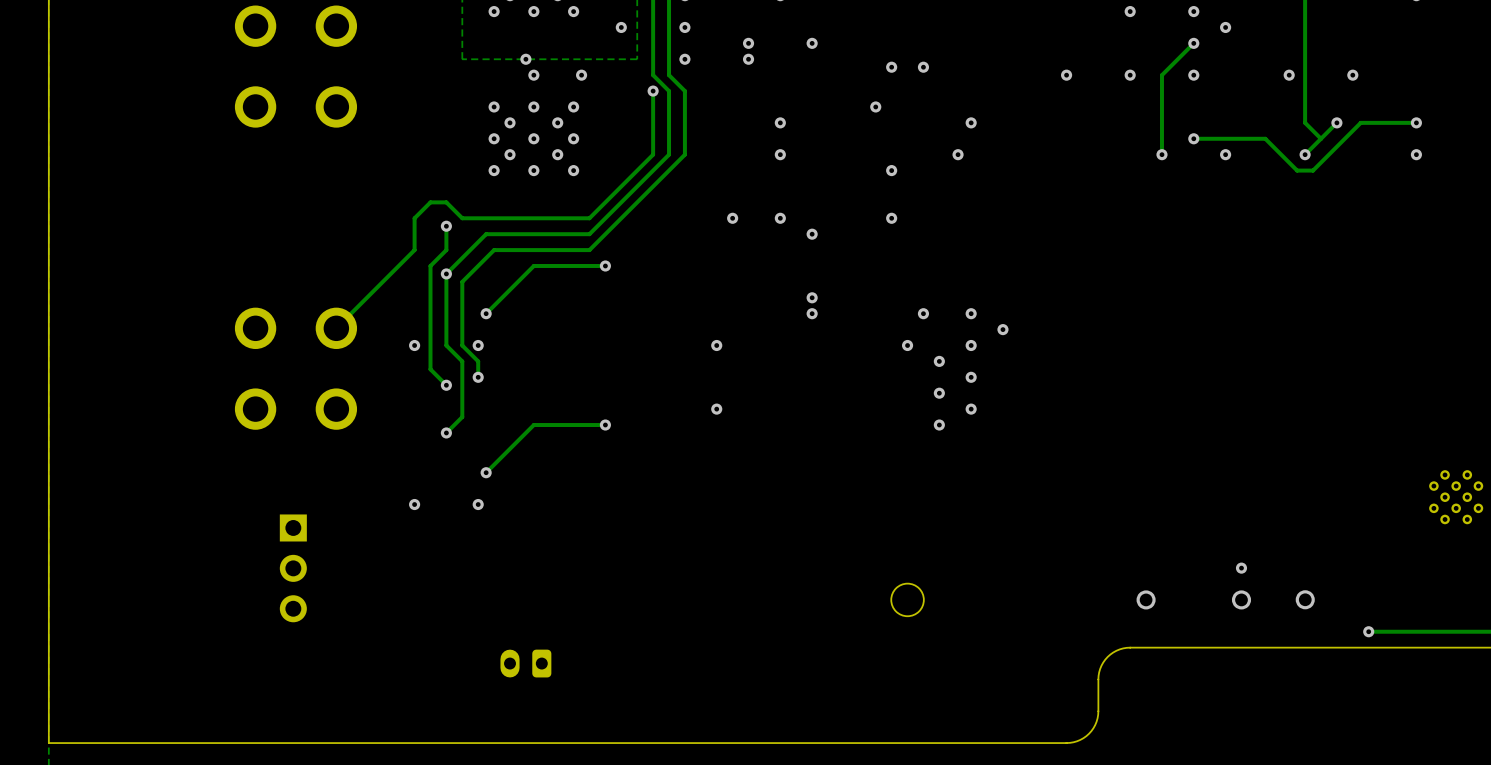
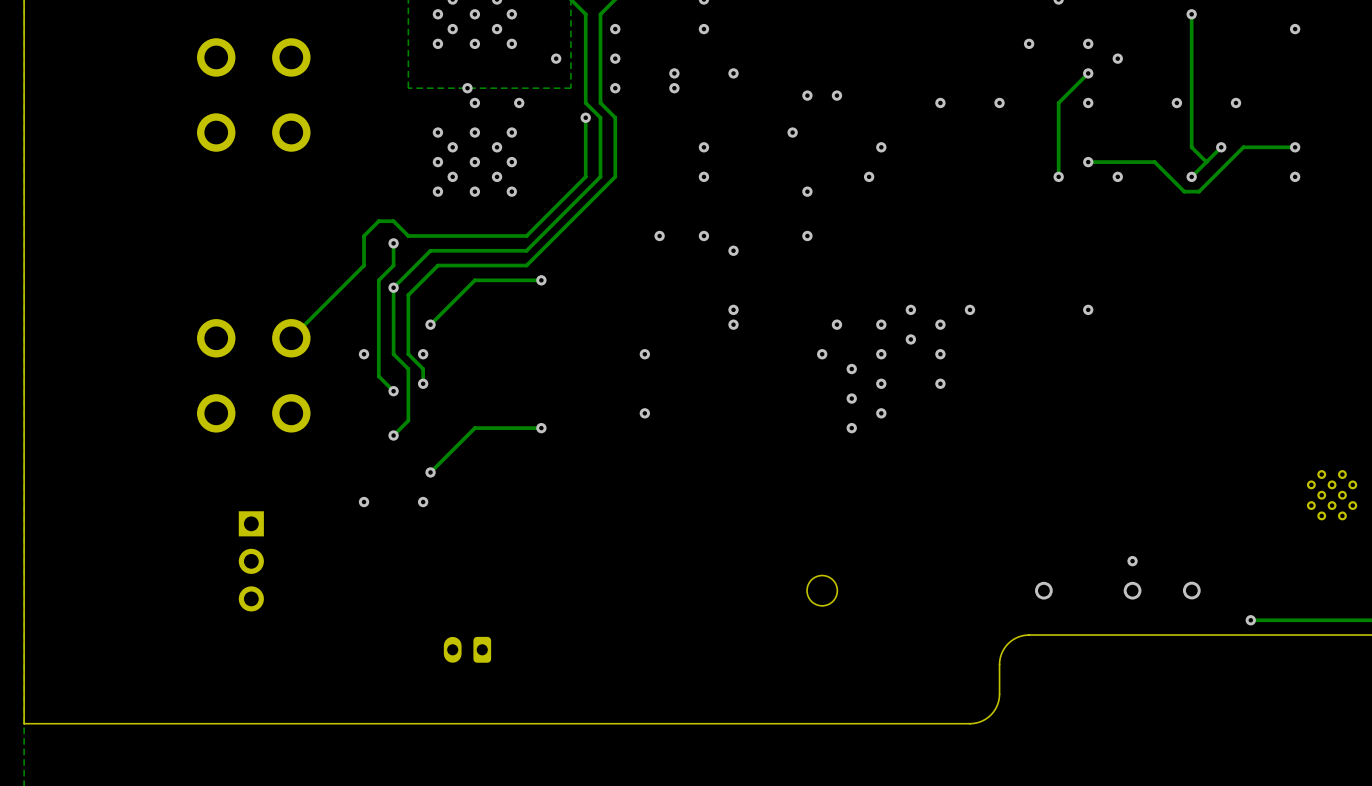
via: none -> (940, 102)
via: (1066, 75) -> none
via: none -> (999, 102)
via: (1130, 75) -> none
via: none -> (910, 309)
via: none -> (969, 309)
via: none -> (1088, 309)
via: none -> (940, 324)
via: none -> (940, 354)
via: none -> (940, 383)

